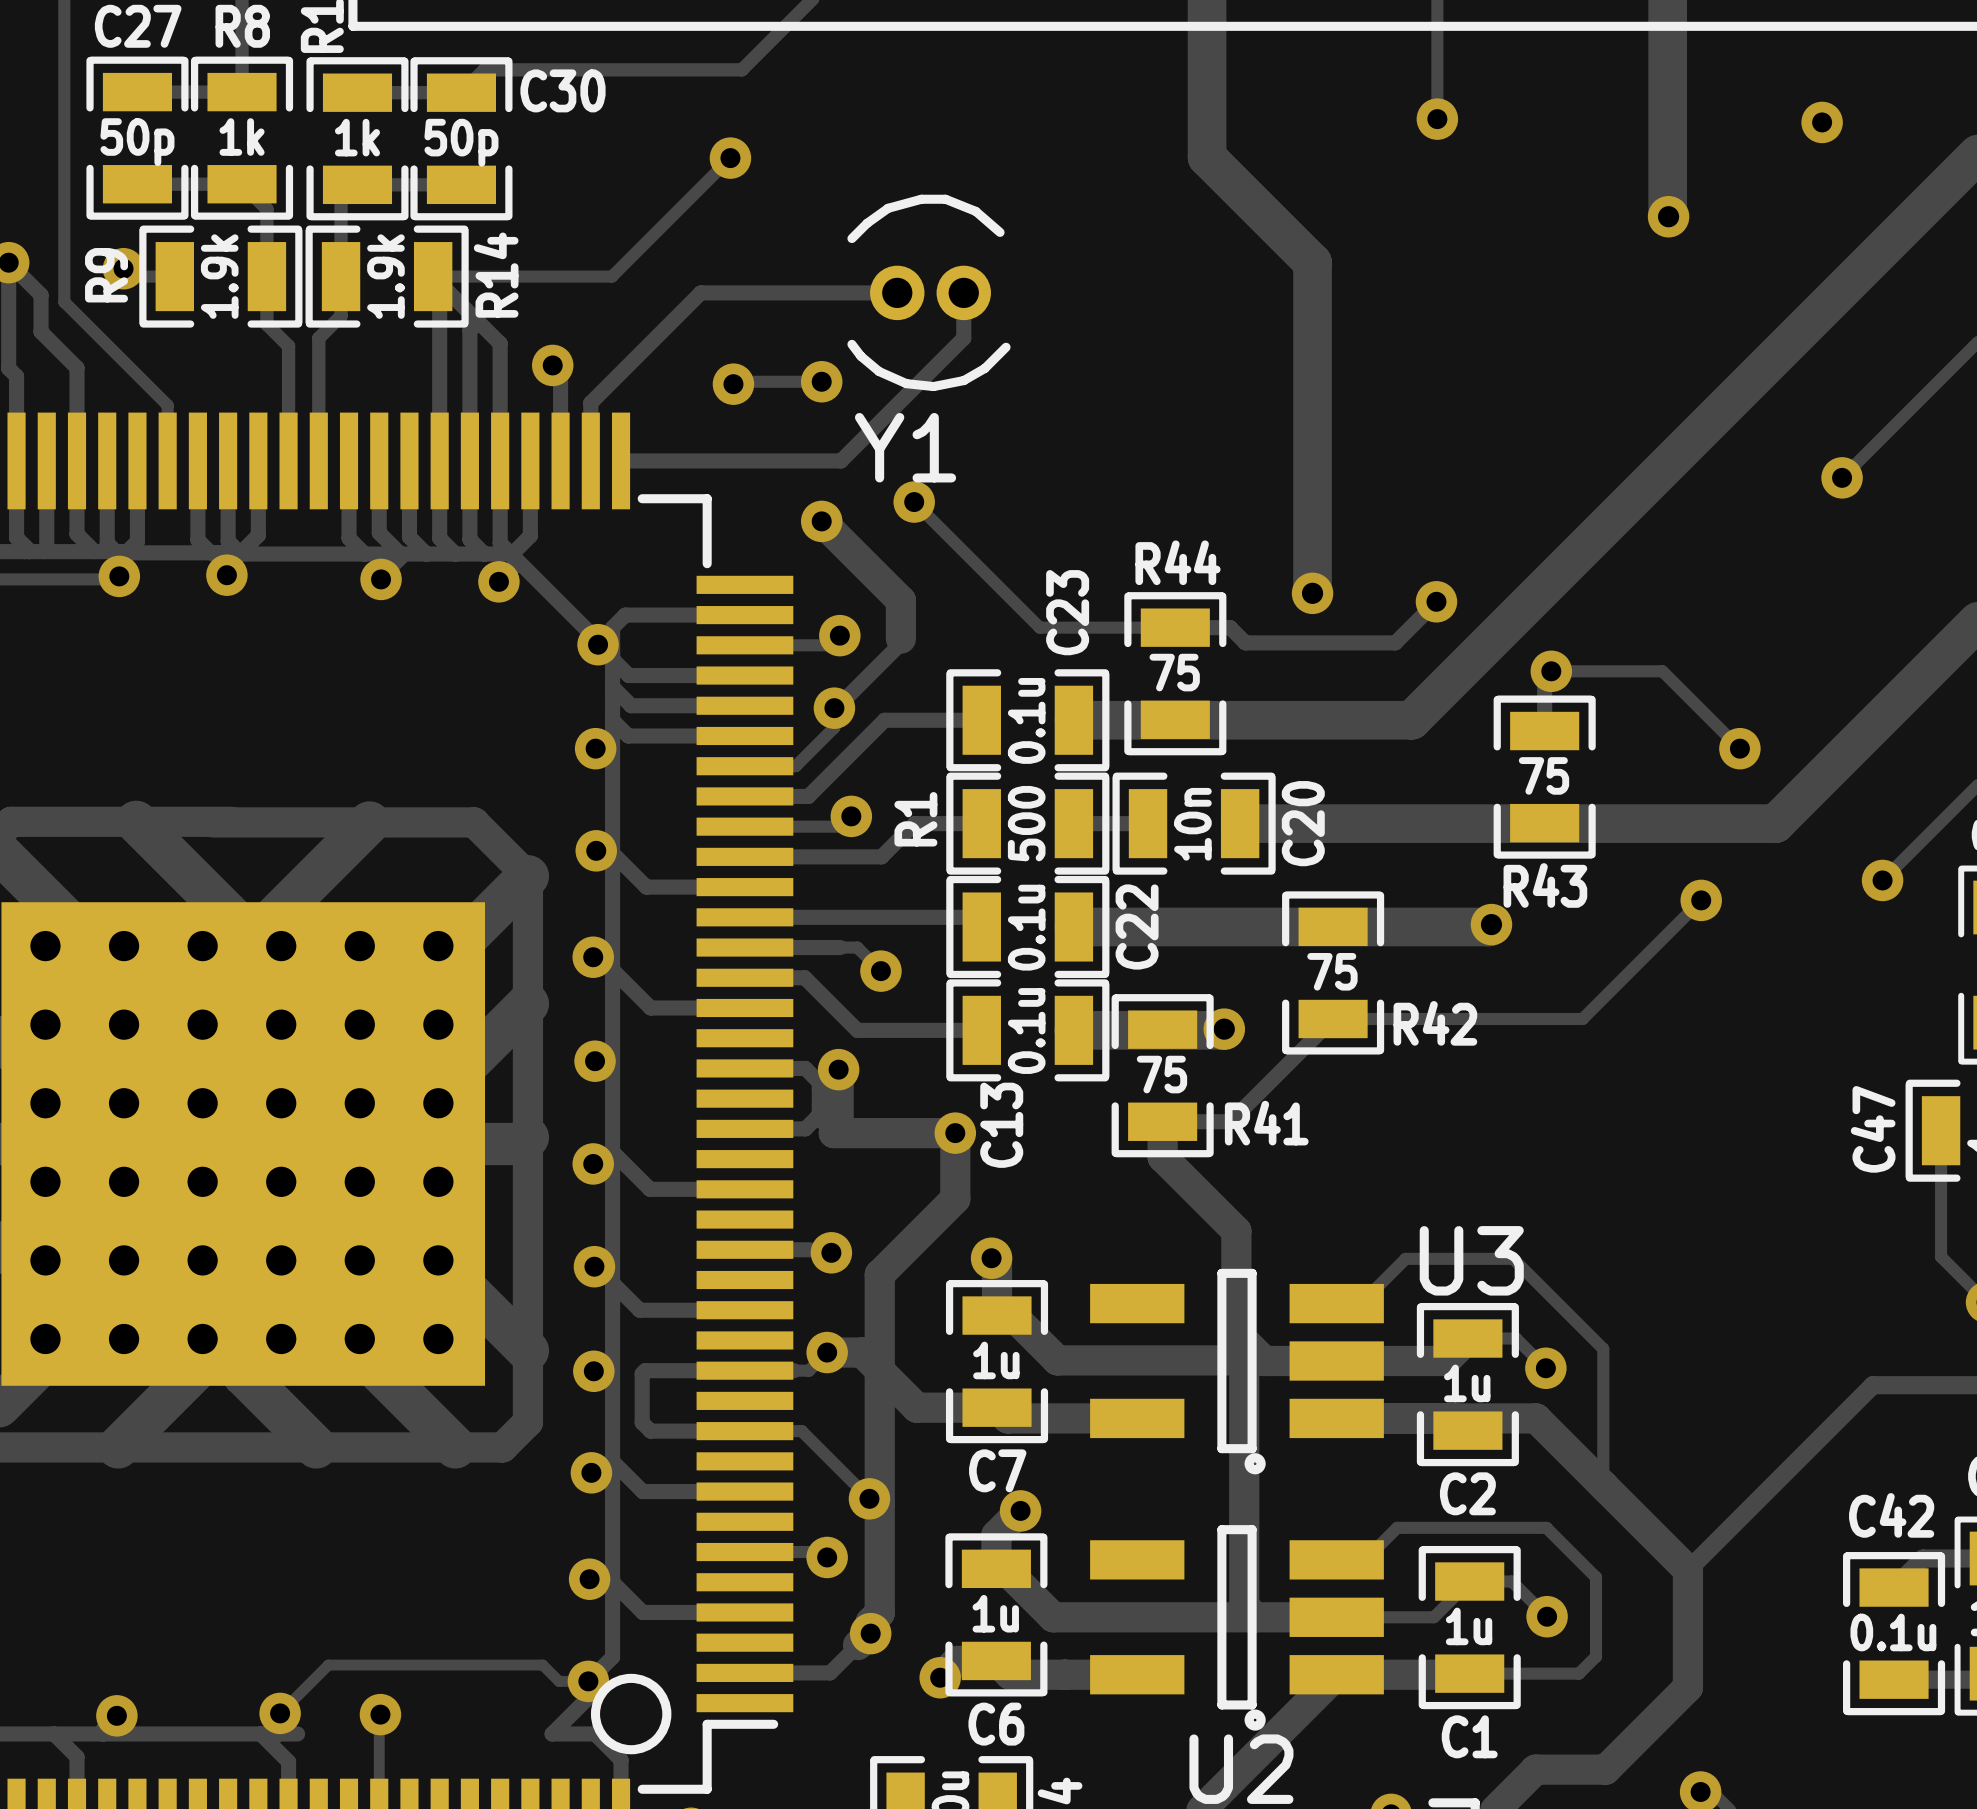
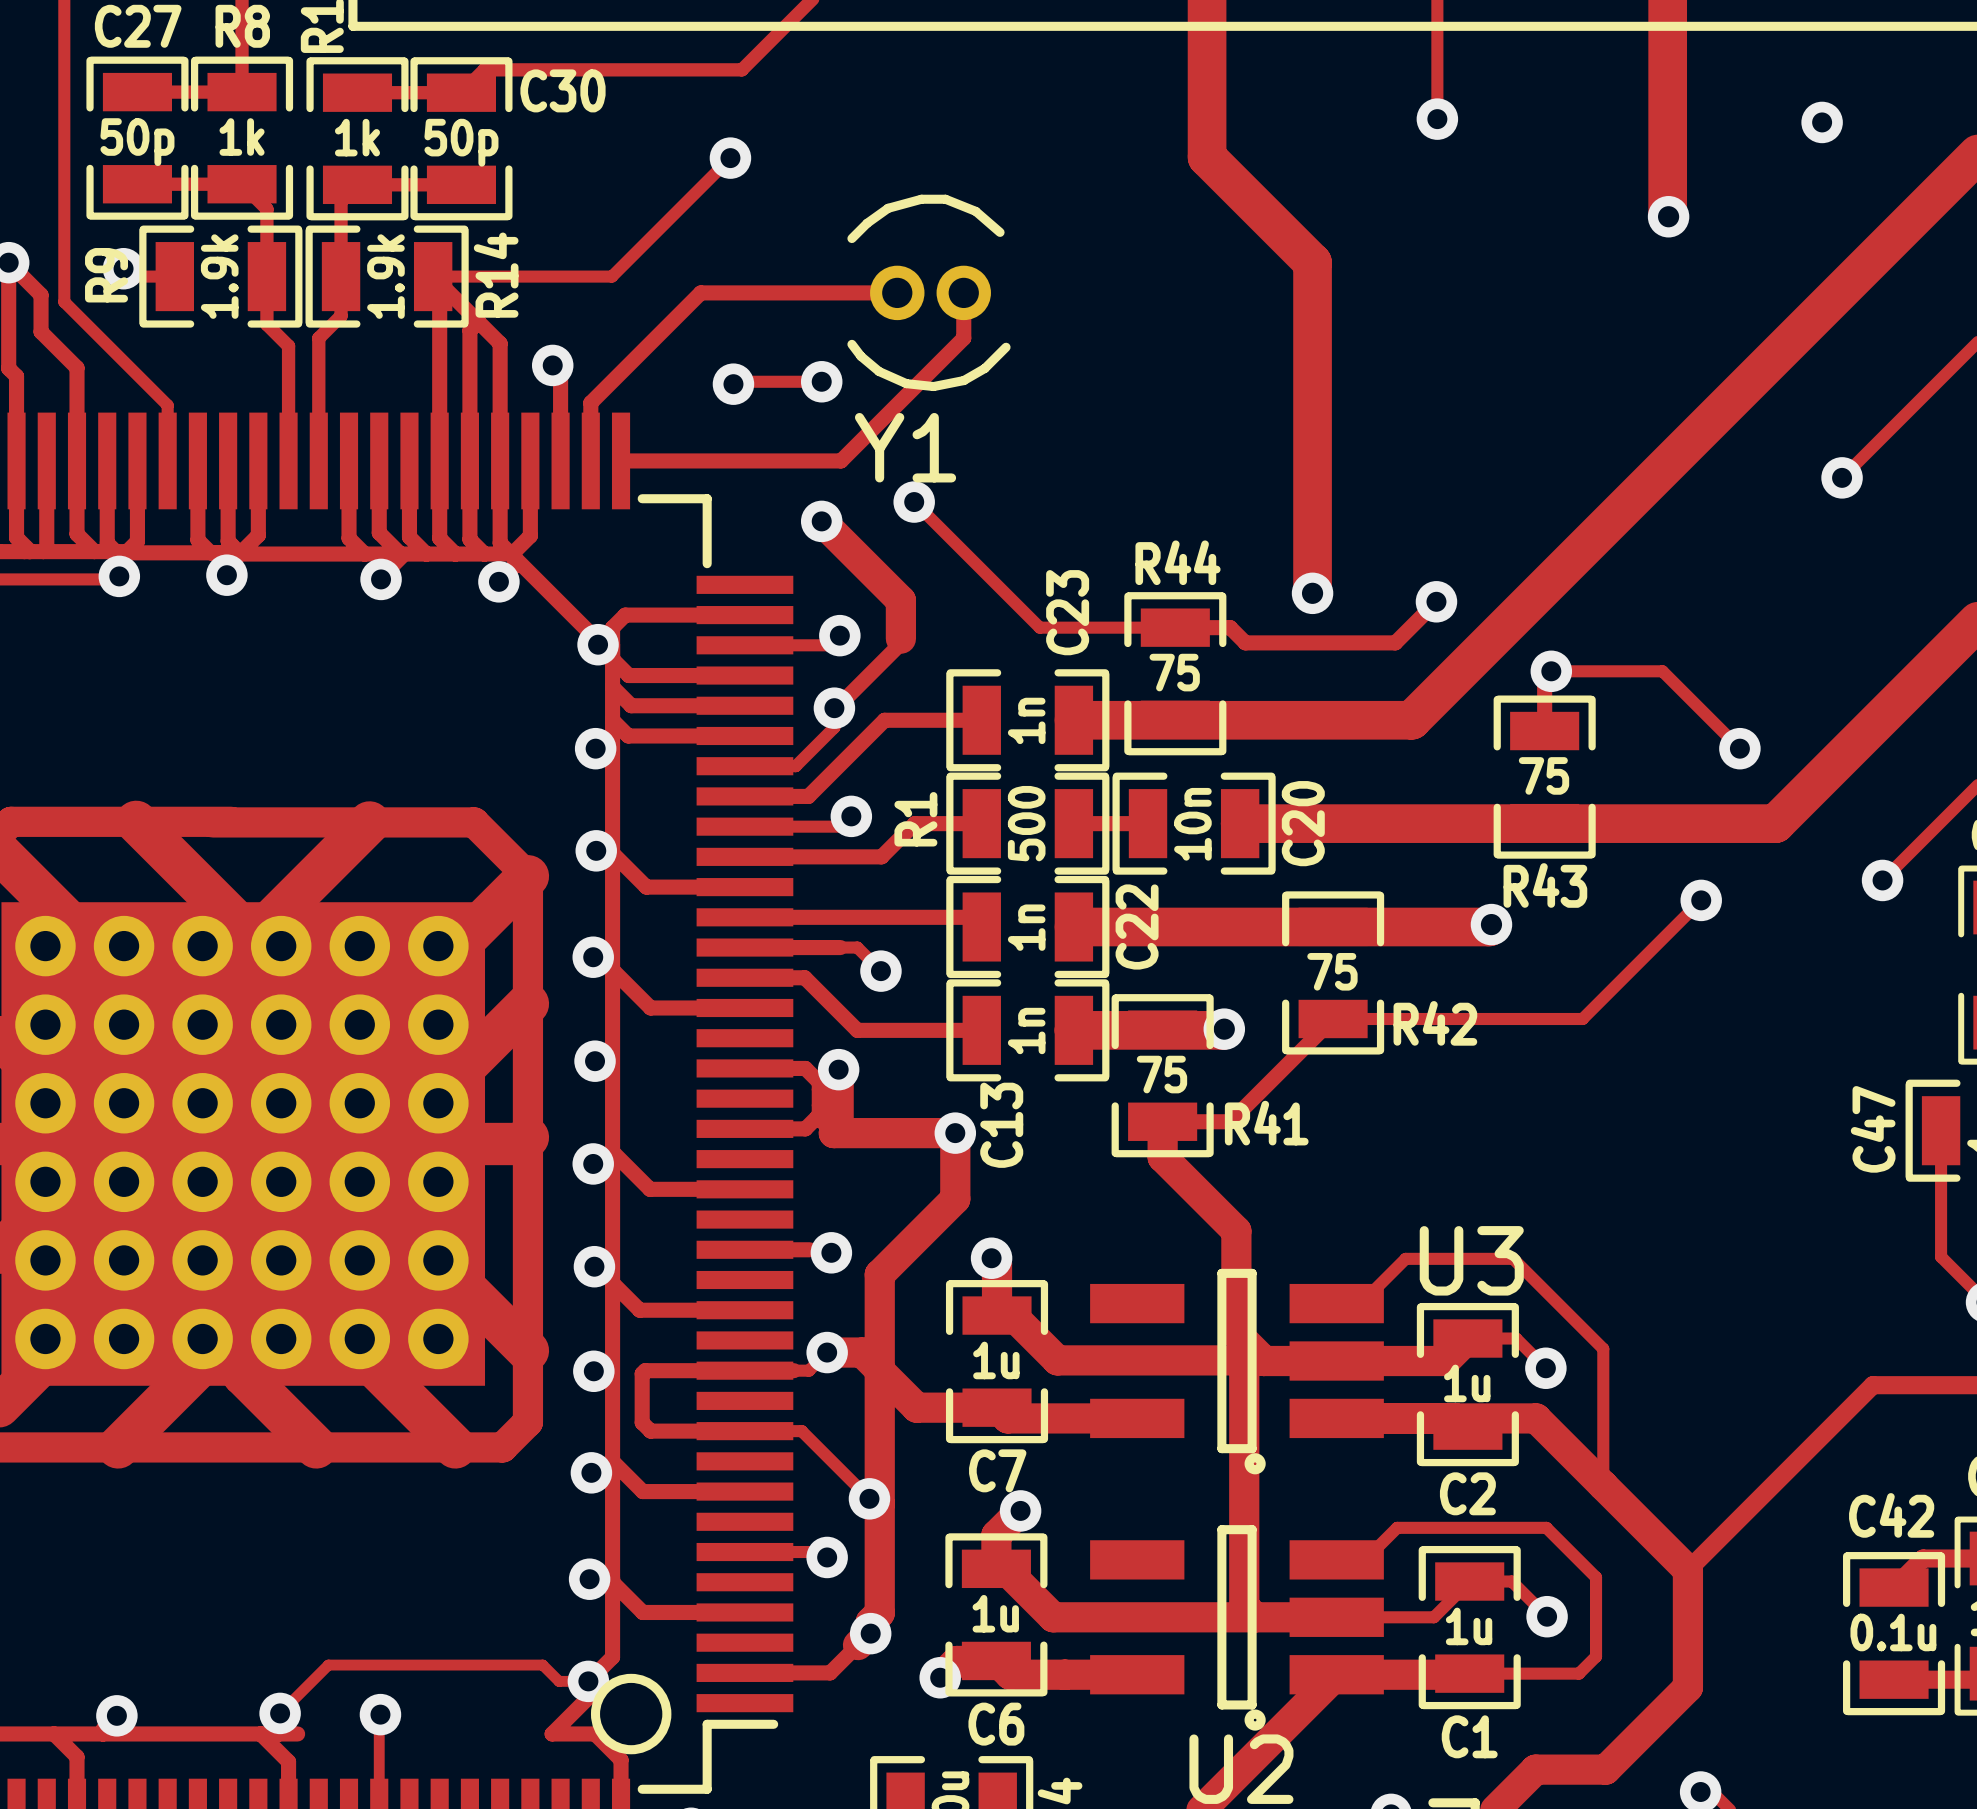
C23 value: 0.1u (1026, 720) -> 1n (1026, 720)
C22 value: 0.1u (1026, 927) -> 1n (1026, 927)
C13 value: 0.1u (1026, 1031) -> 1n (1026, 1031)

